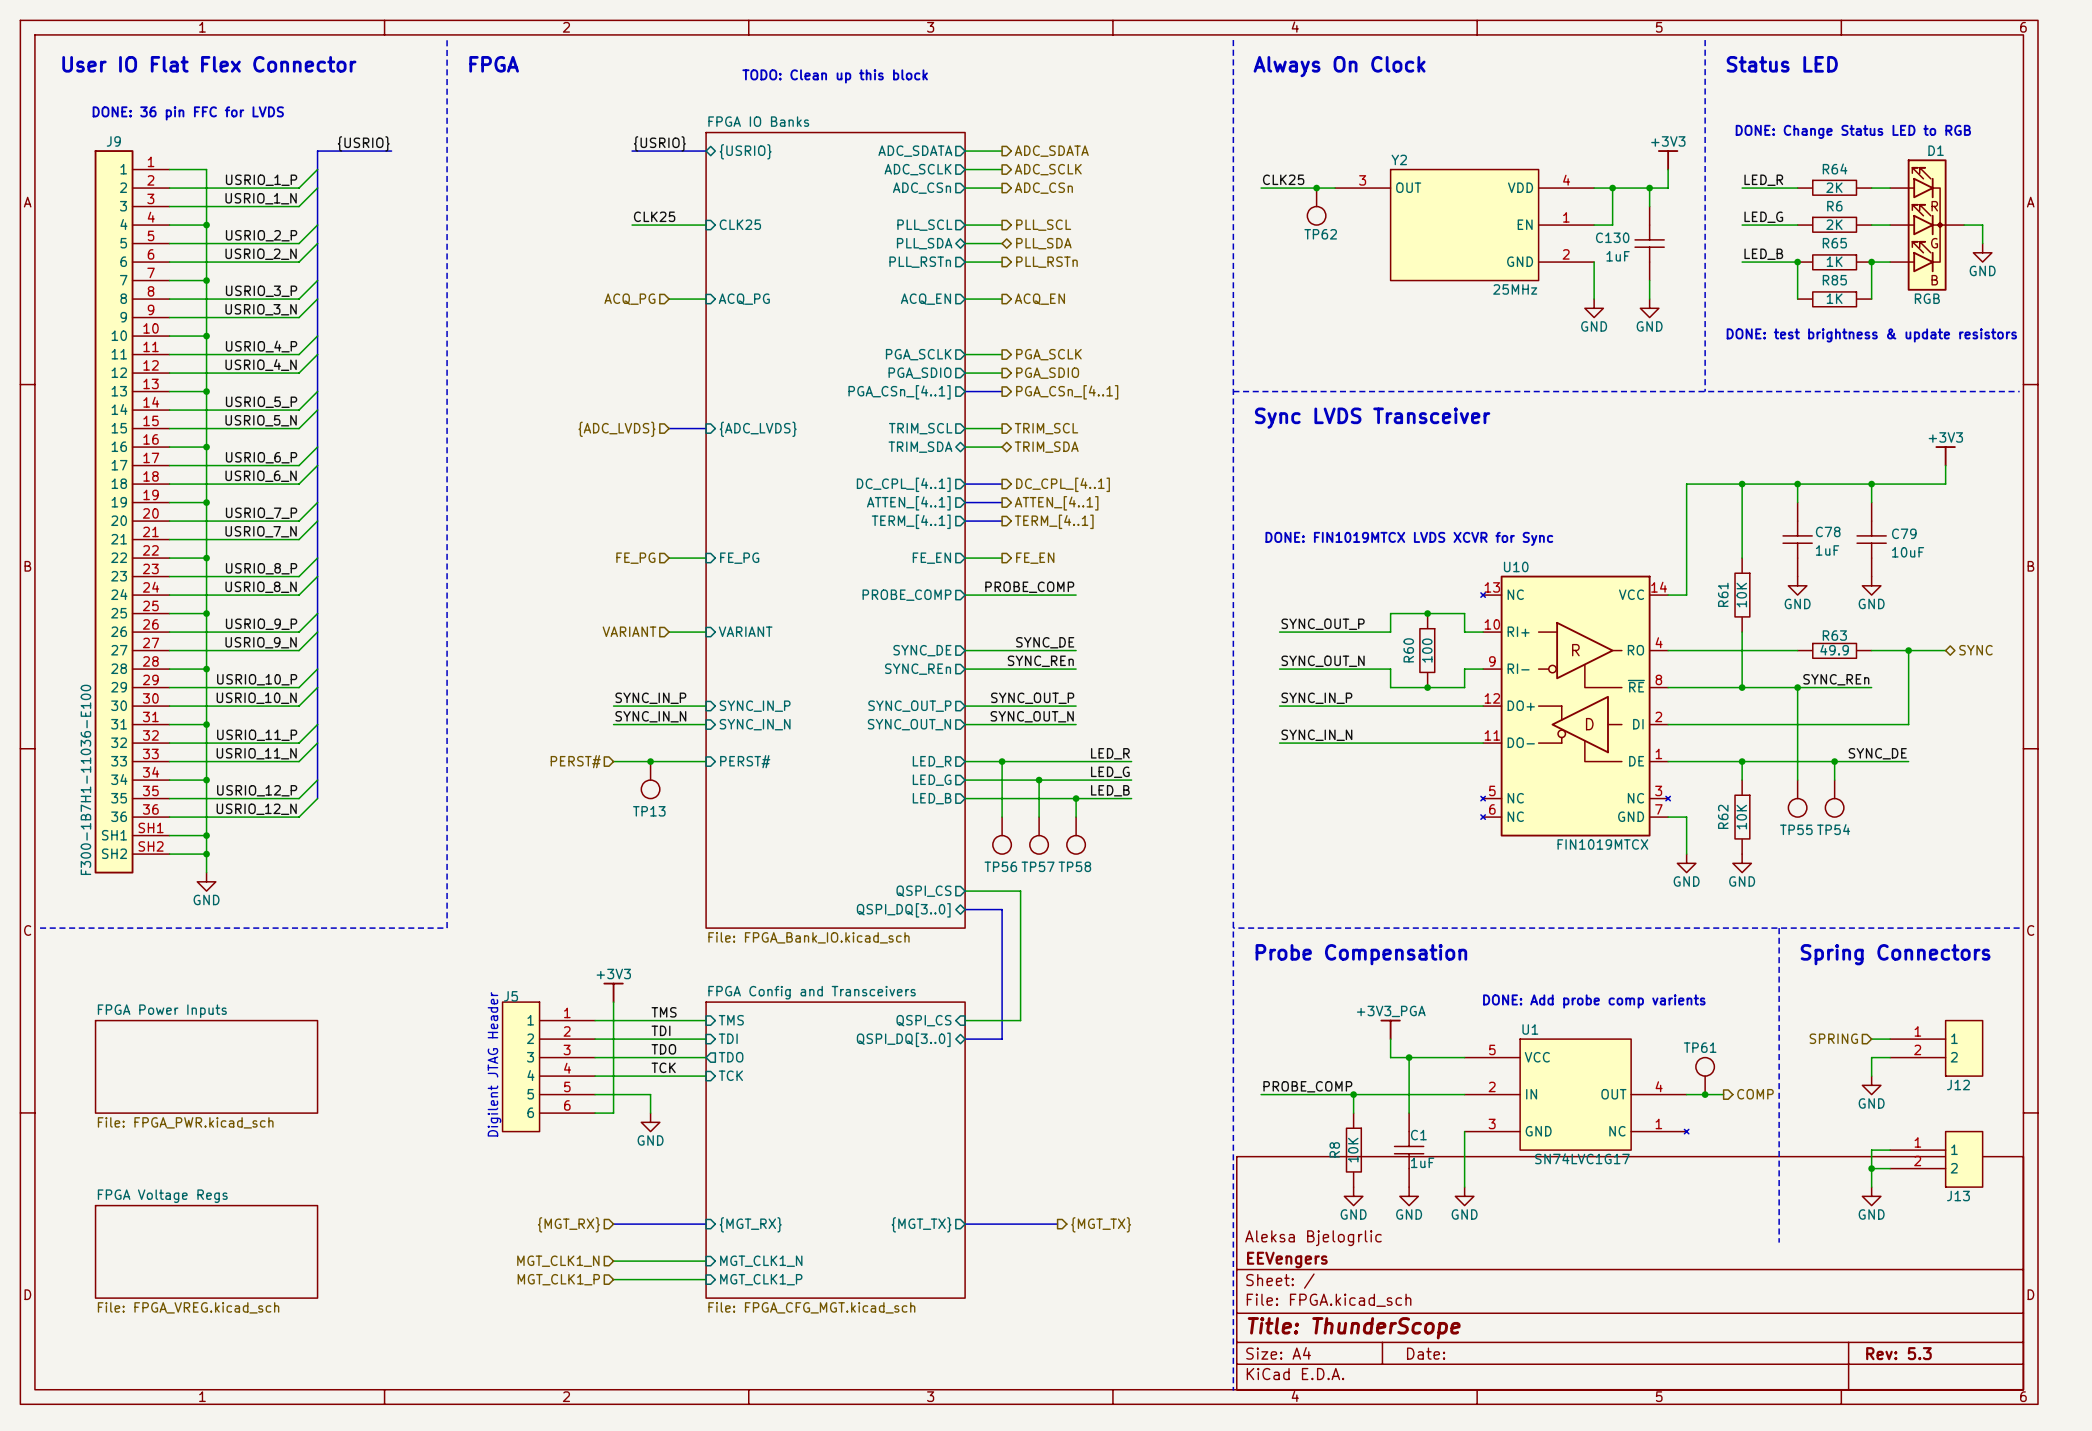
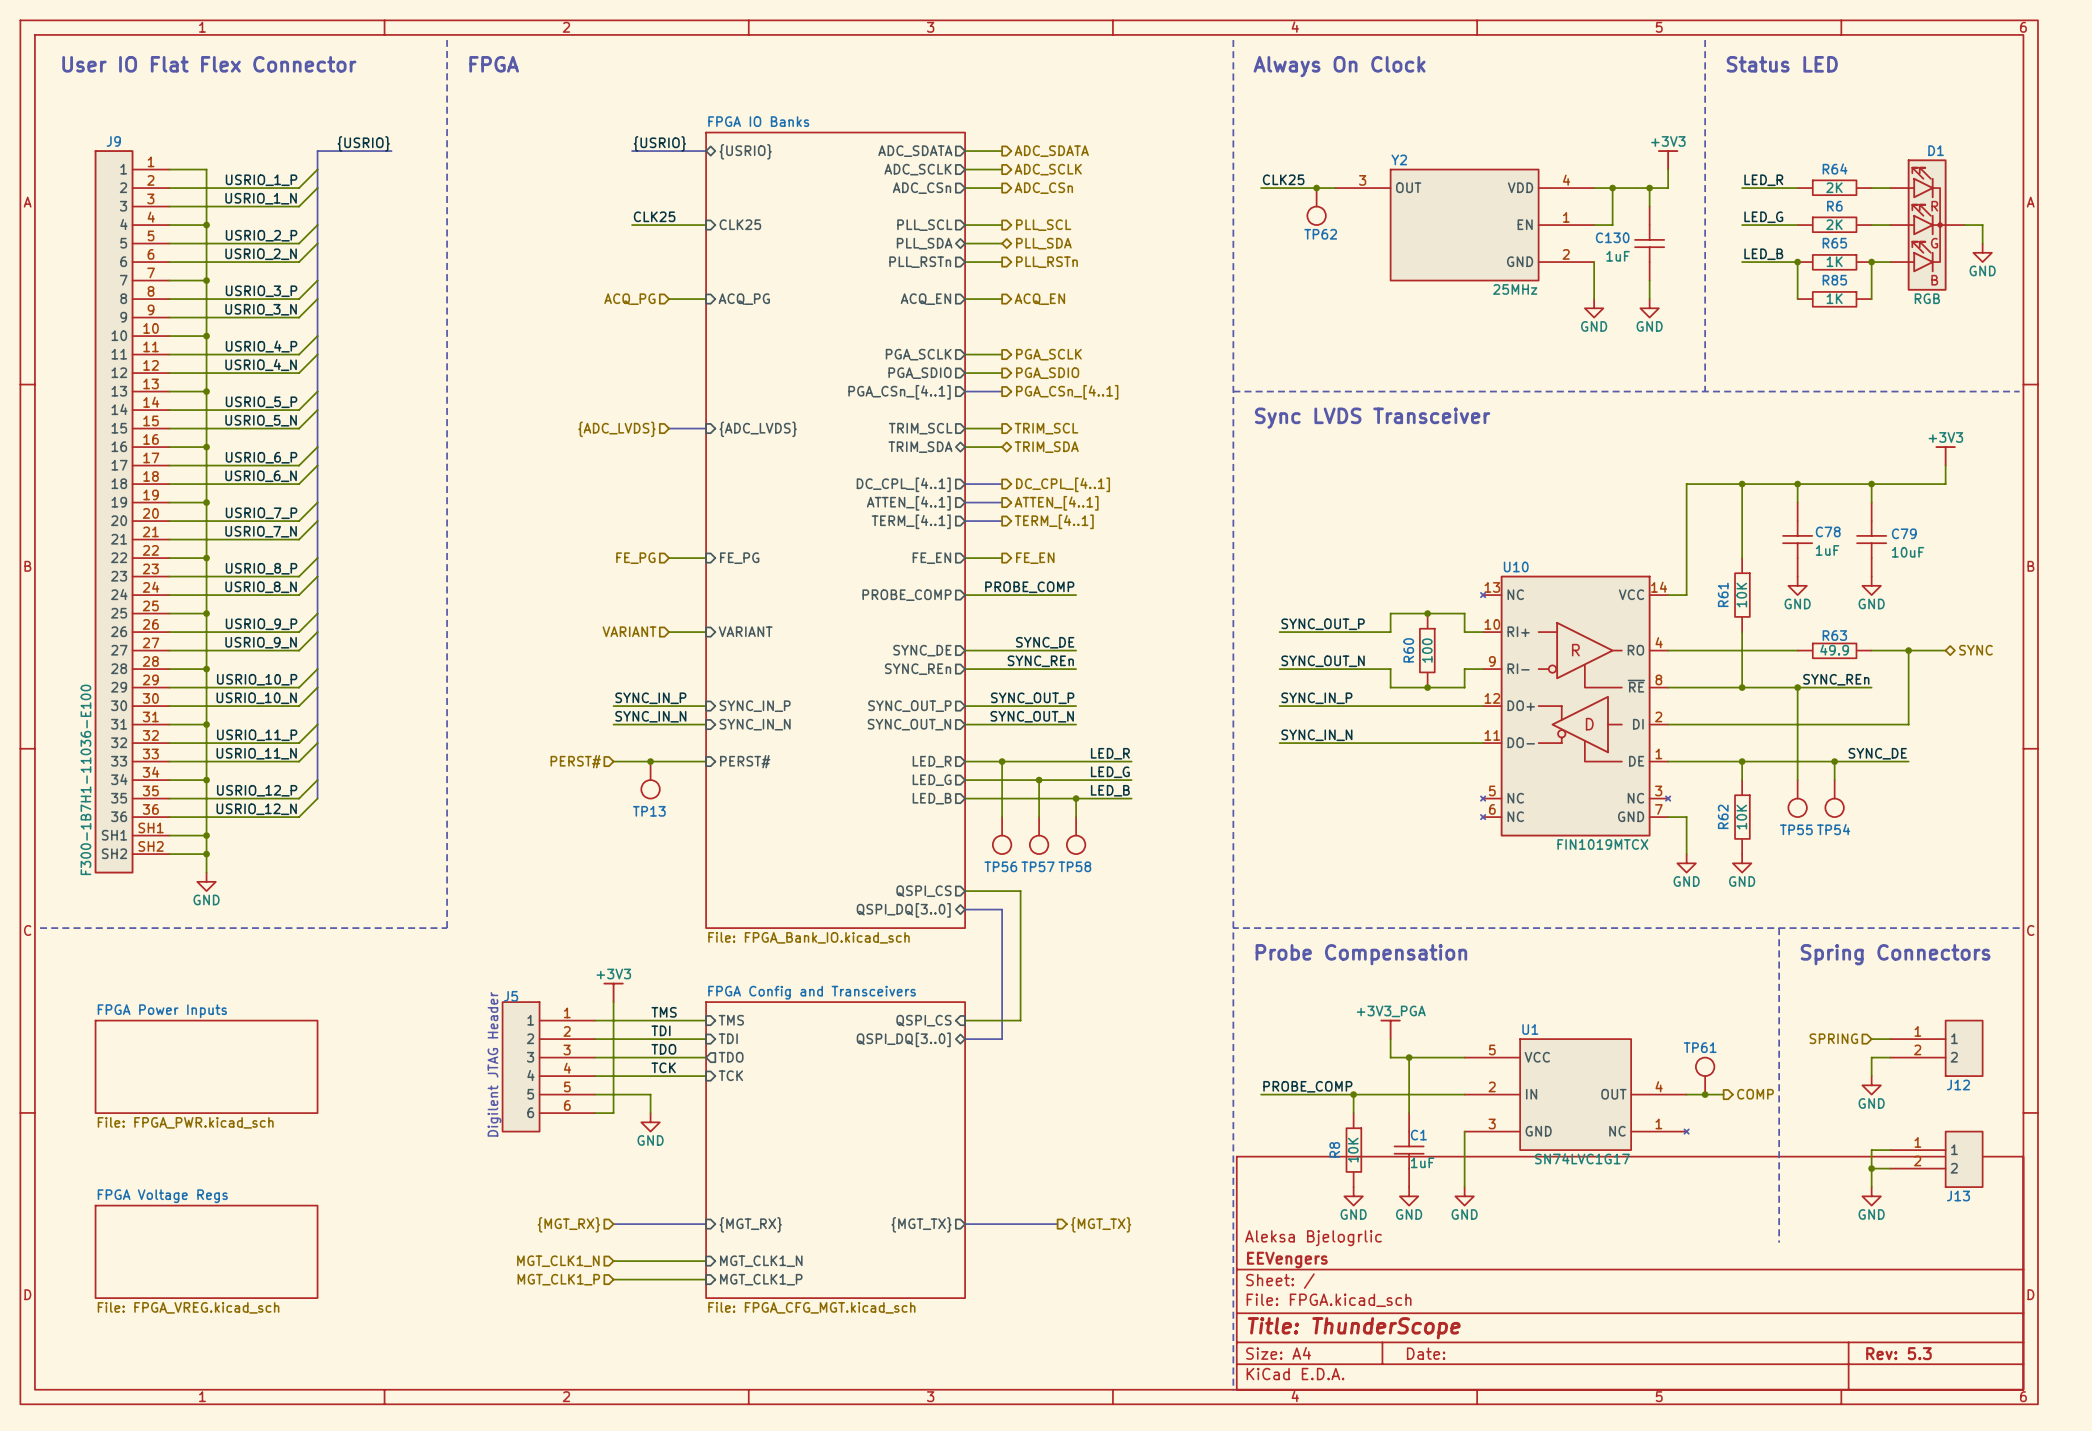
text: TODO: Clean up this block (835, 76) -> none
text: DONE: 36 pin FFC for LVDS (188, 113) -> none
text: DONE: Change Status LED to RGB (1853, 131) -> none
text: DONE: test brightness & update resistors (1871, 335) -> none
text: DONE: FIN1019MTCX LVDS XCVR for Sync (1409, 538) -> none
text: DONE: Add probe comp varients (1594, 1001) -> none

